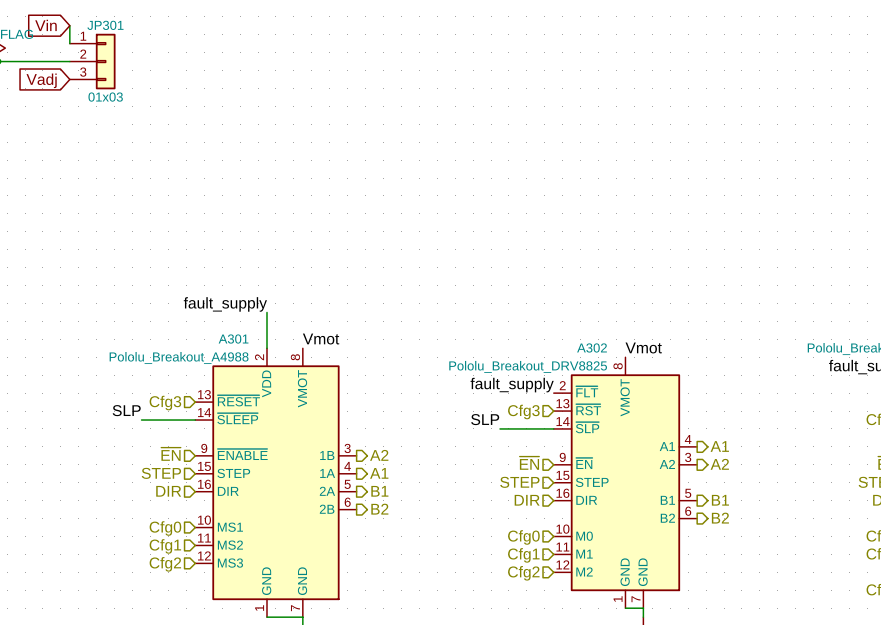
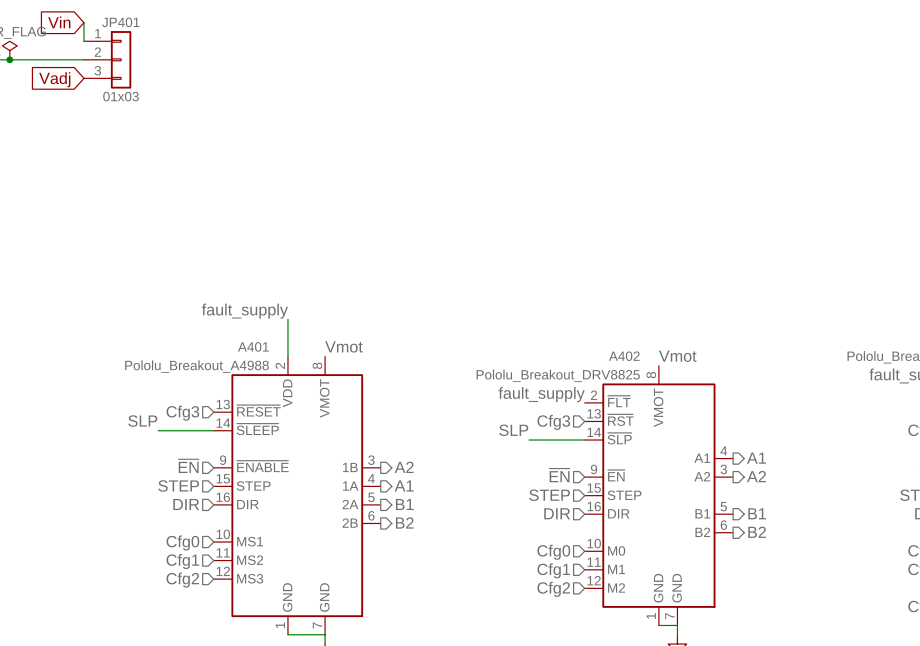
JP301 name: JP301 (105, 25) -> JP401 (120, 22)
A301 name: A301 (233, 339) -> A401 (253, 346)
A302 name: A302 (592, 347) -> A402 (624, 356)

